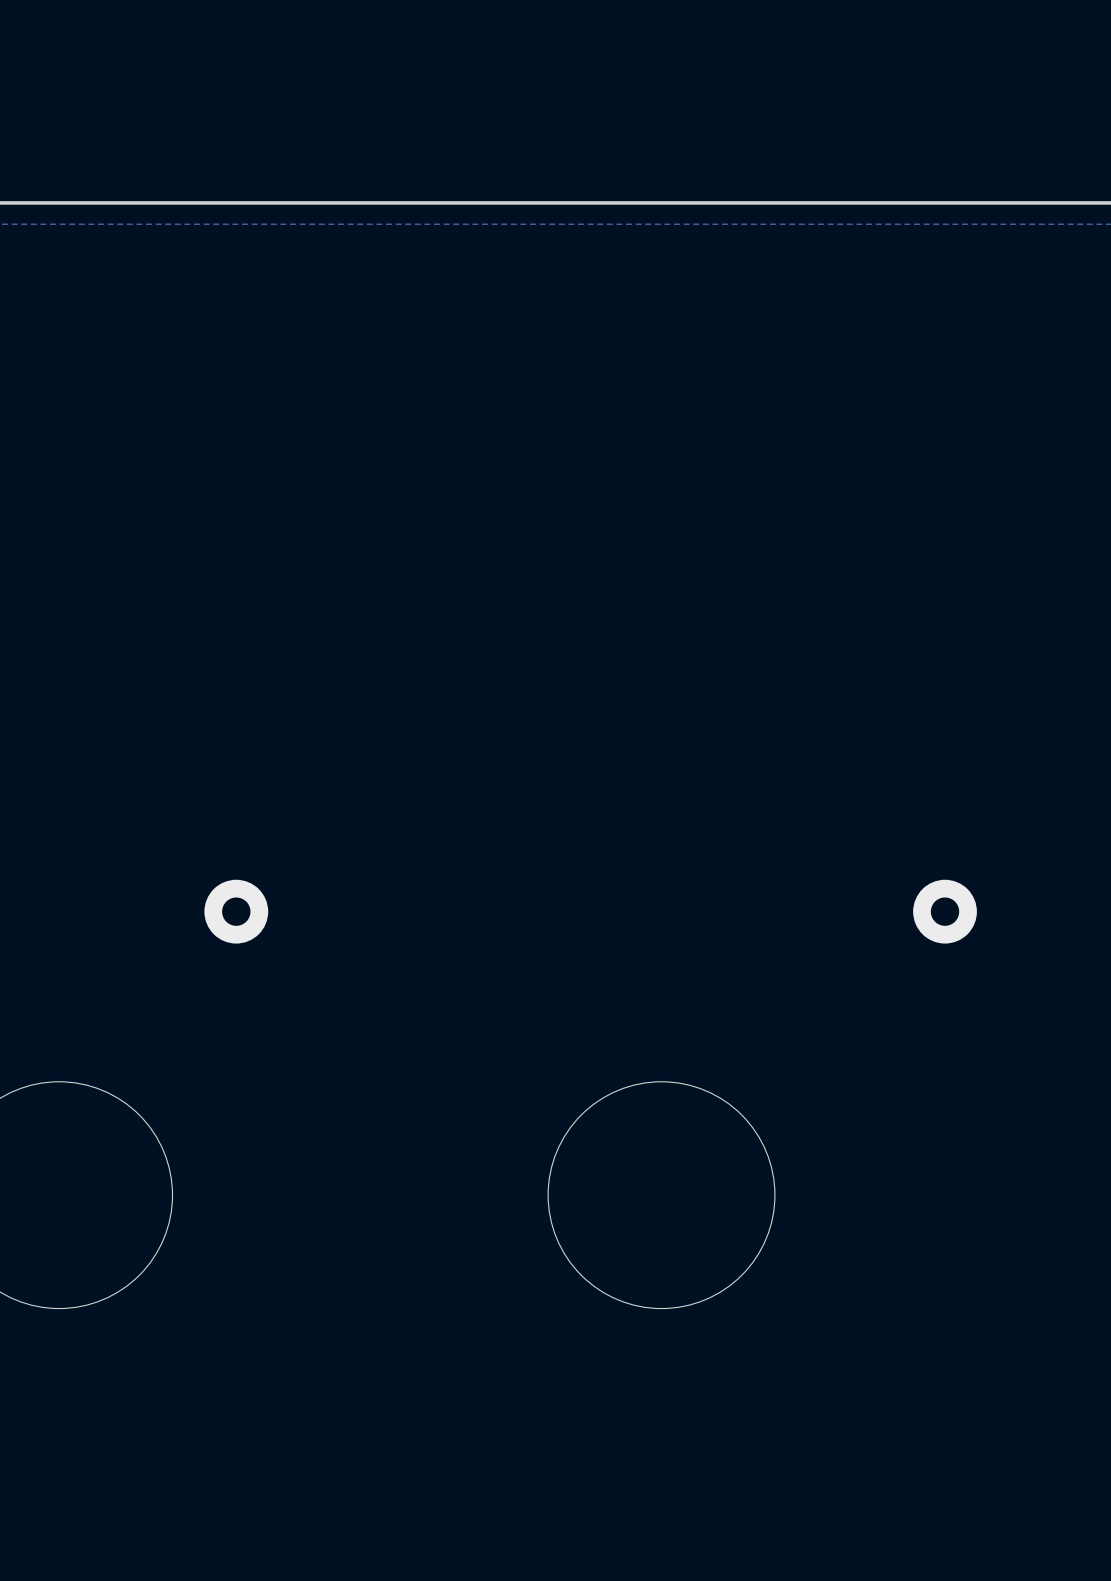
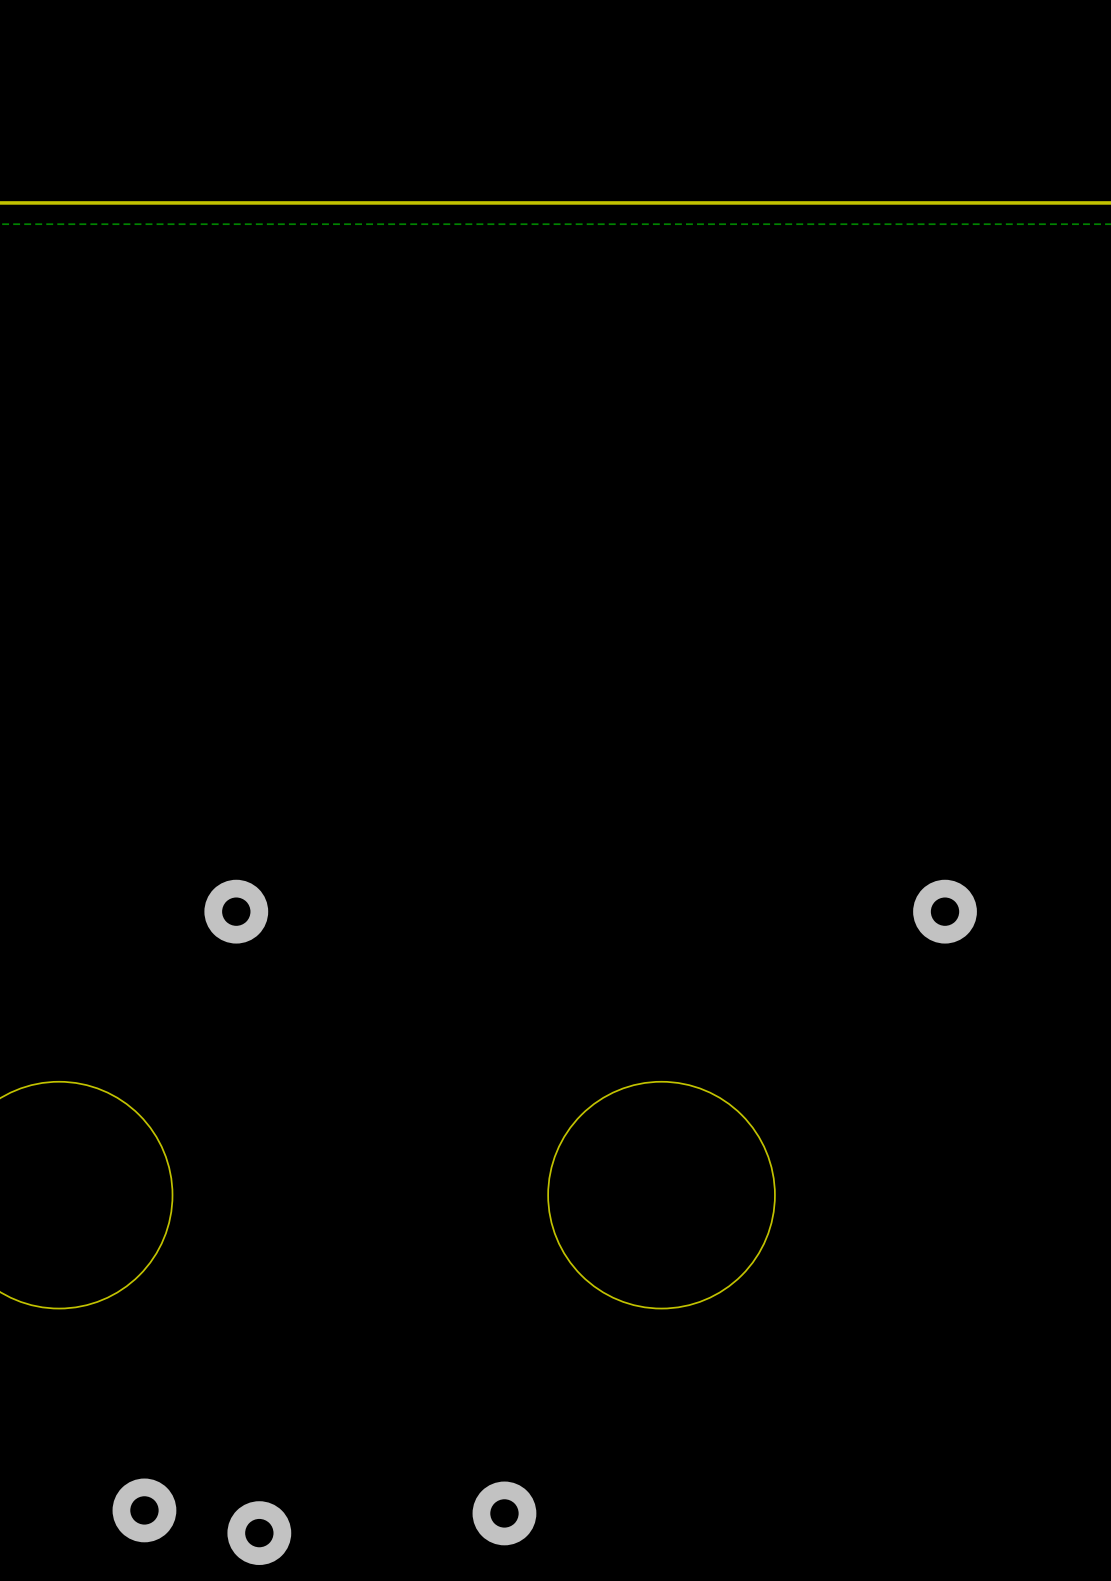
via: none -> (144, 1510)
via: none -> (504, 1513)
via: none -> (259, 1533)

